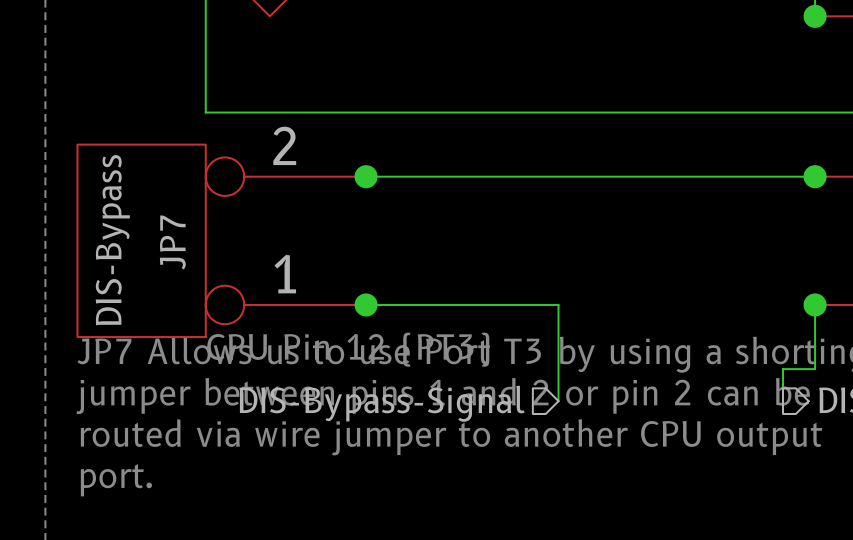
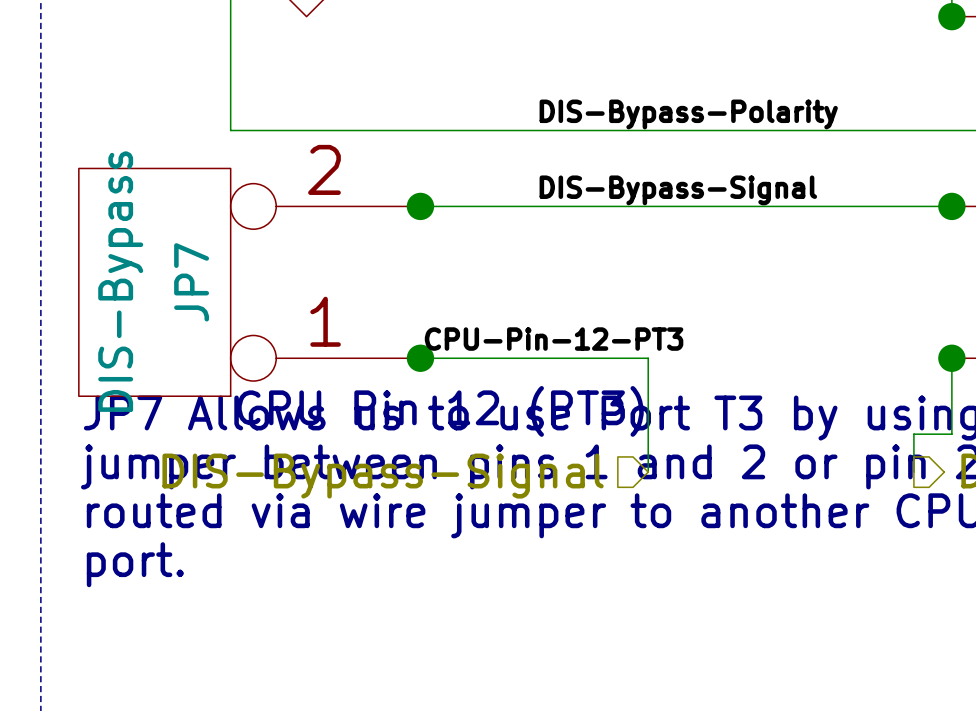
label: none -> DIS-Bypass-Polarity (688, 114)
label: none -> DIS-Bypass-Signal (678, 190)
label: none -> CPU-Pin-12-PT3 (554, 339)

